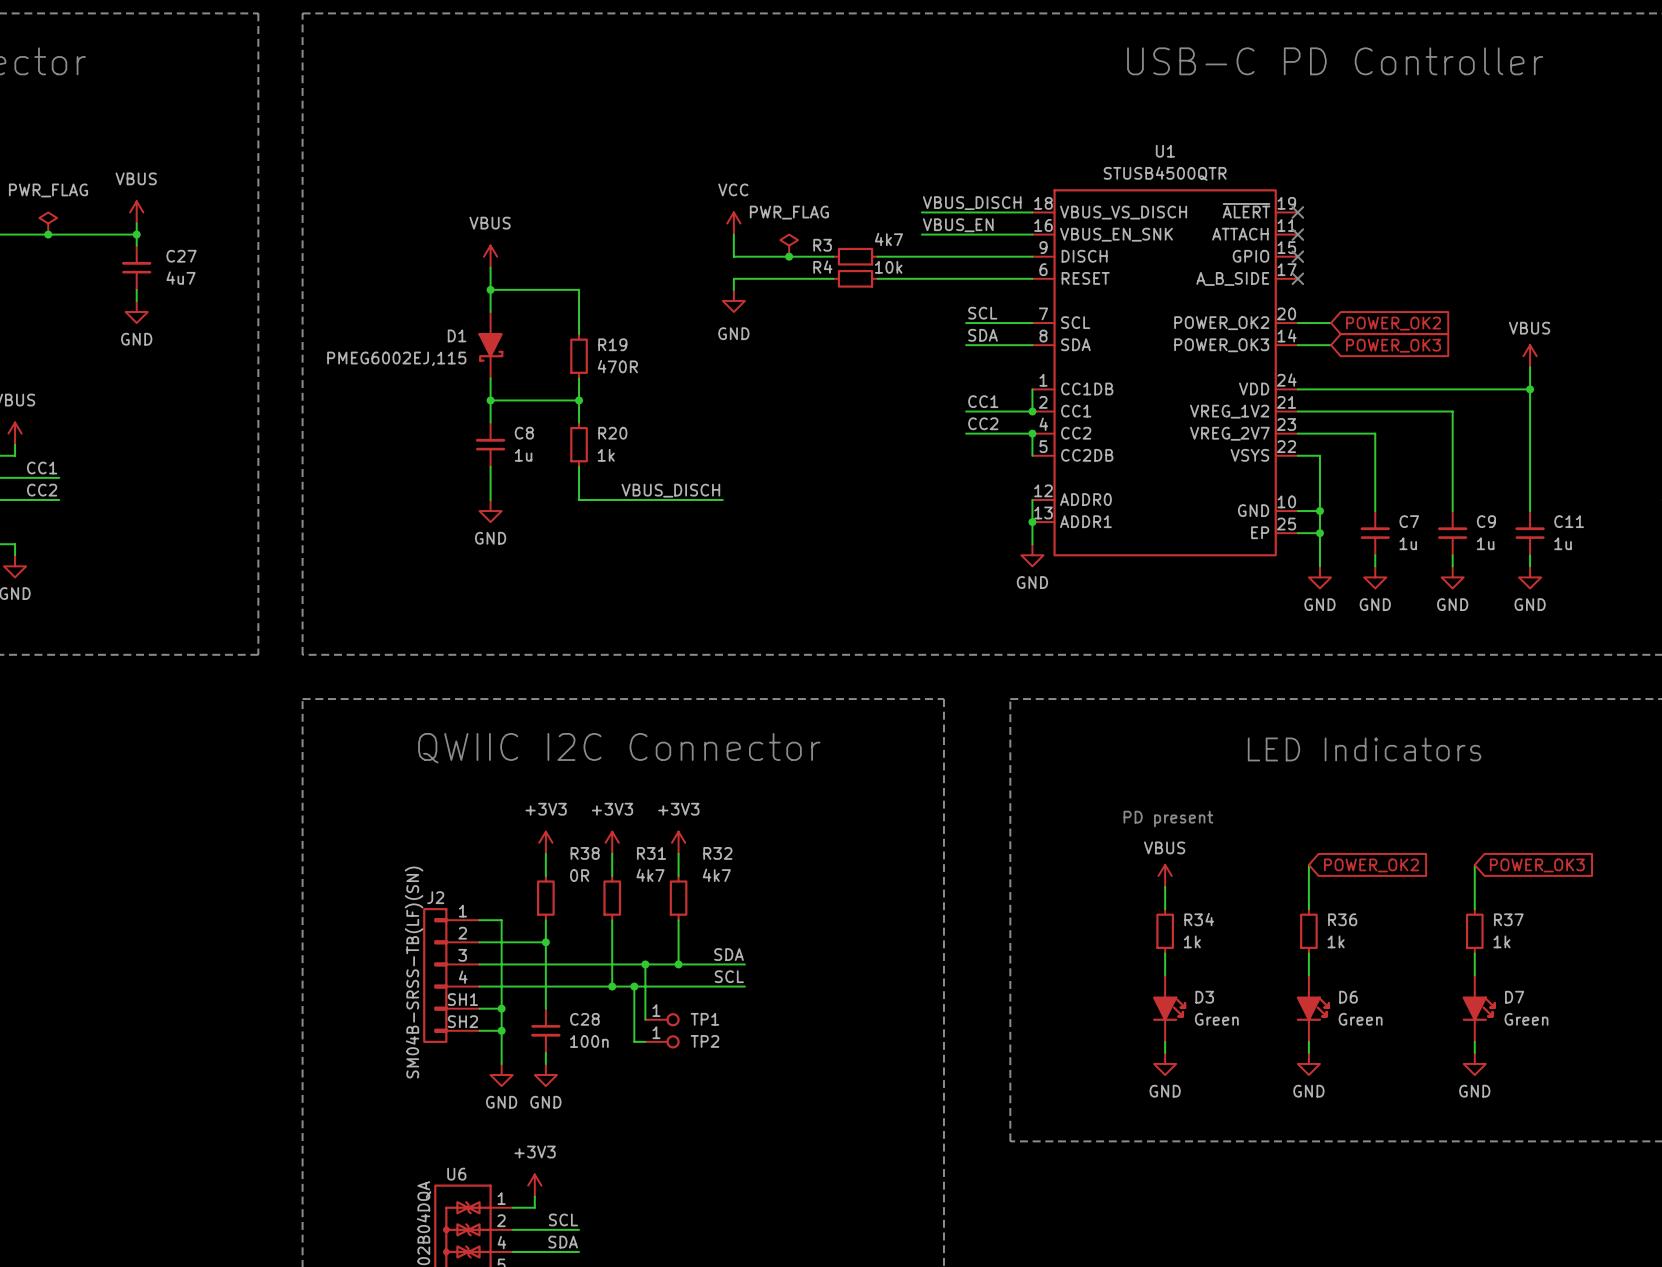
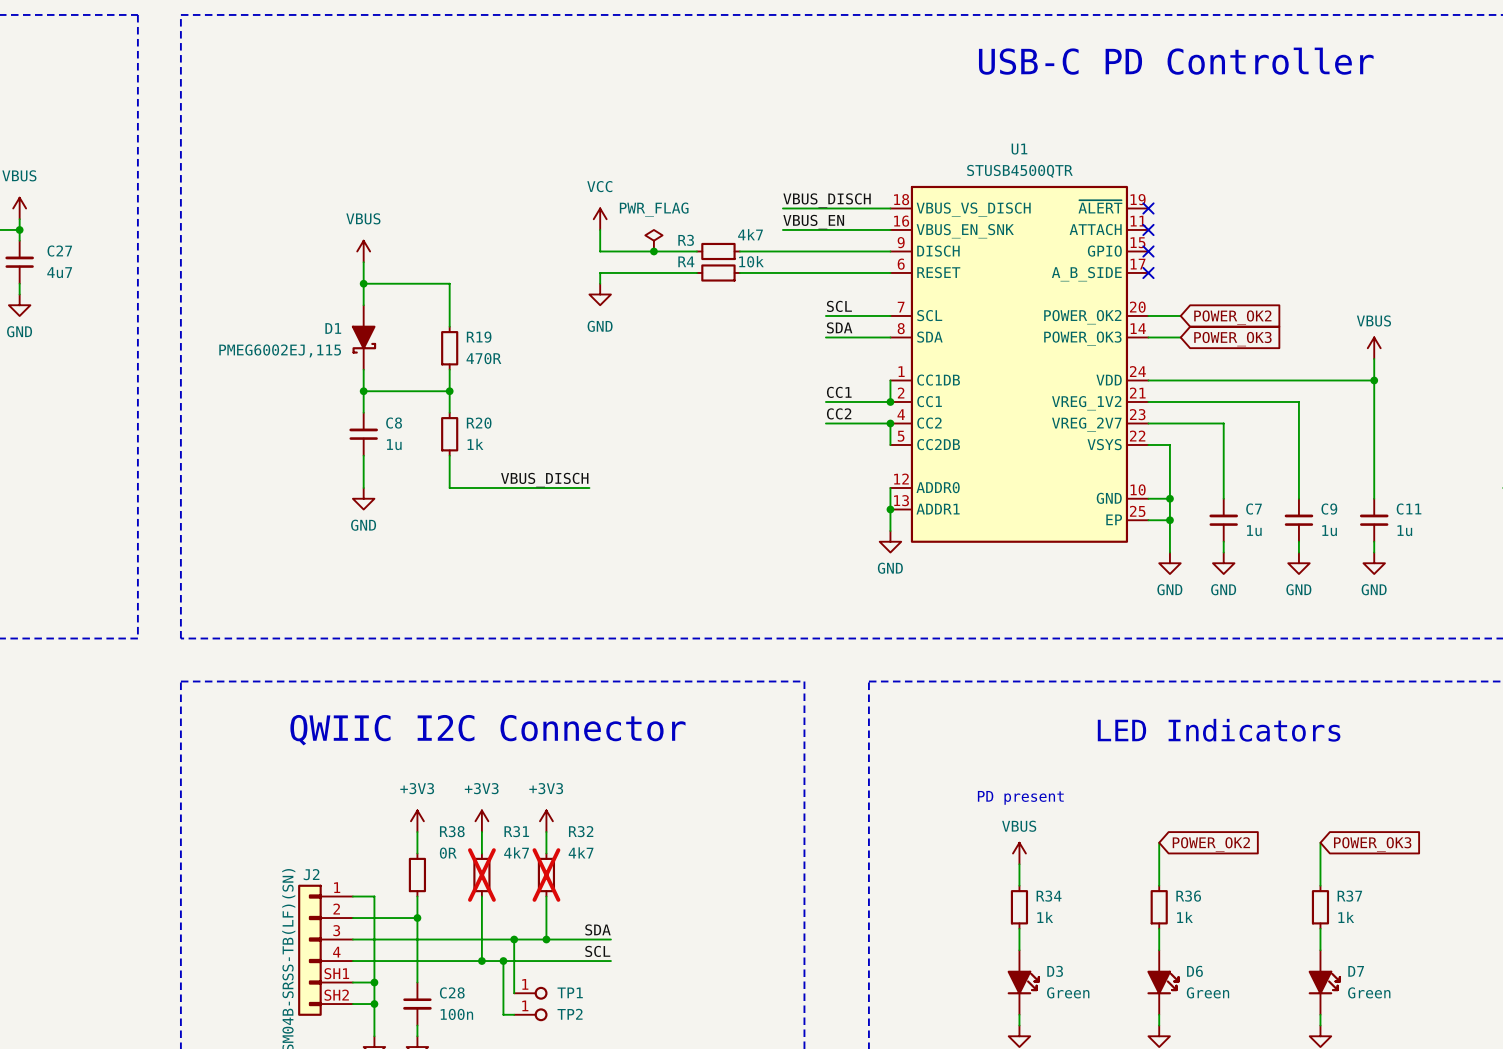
R31 do-not-place cross: none -> (481, 875)
R32 do-not-place cross: none -> (546, 875)

